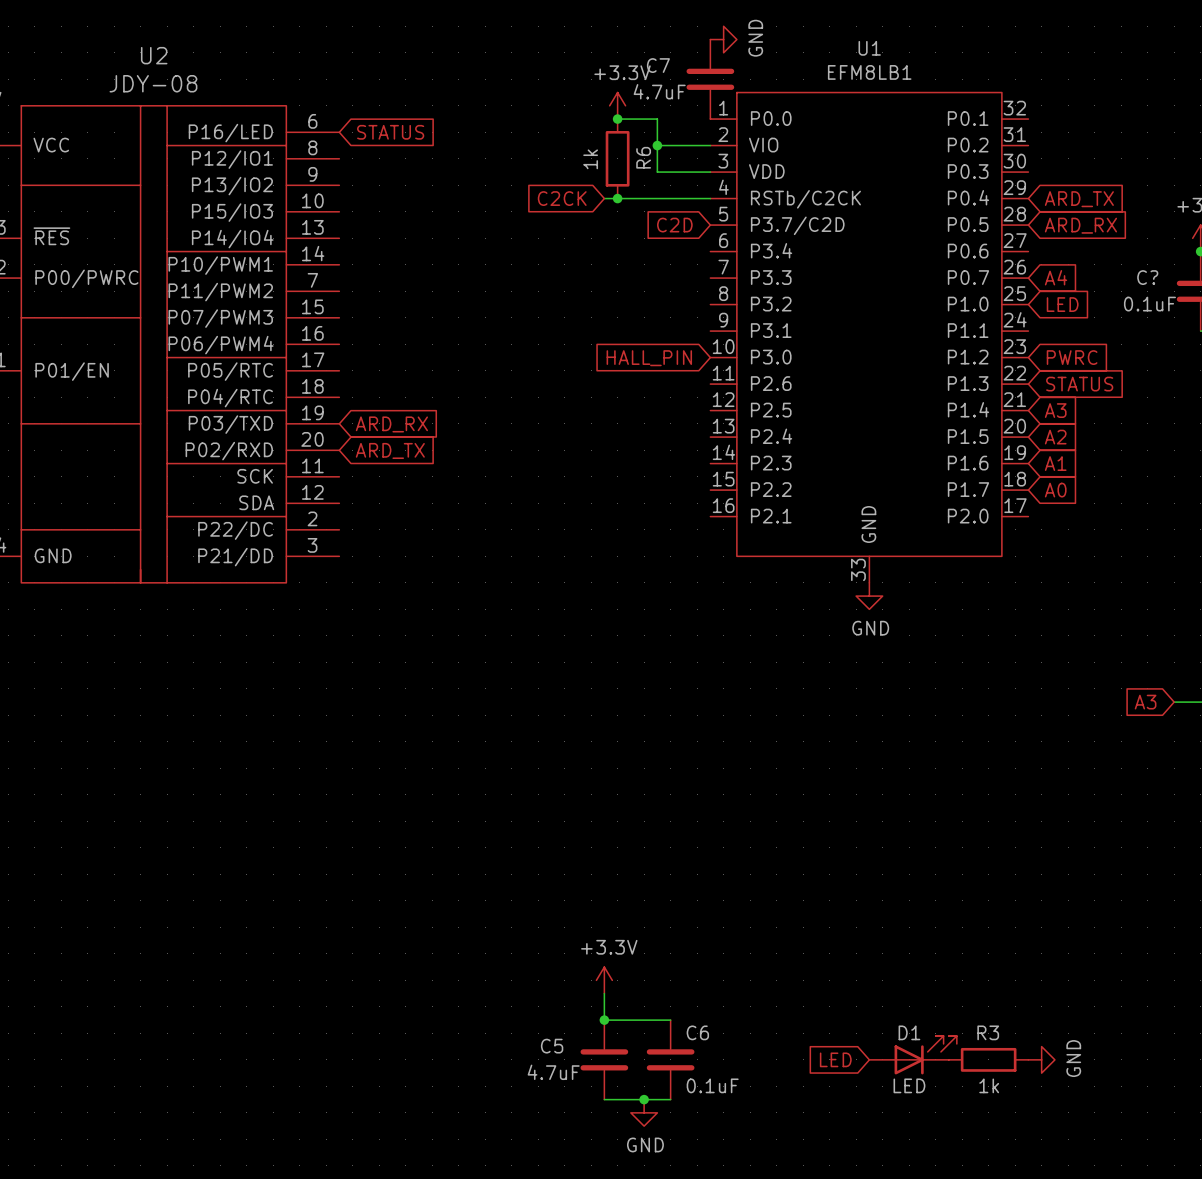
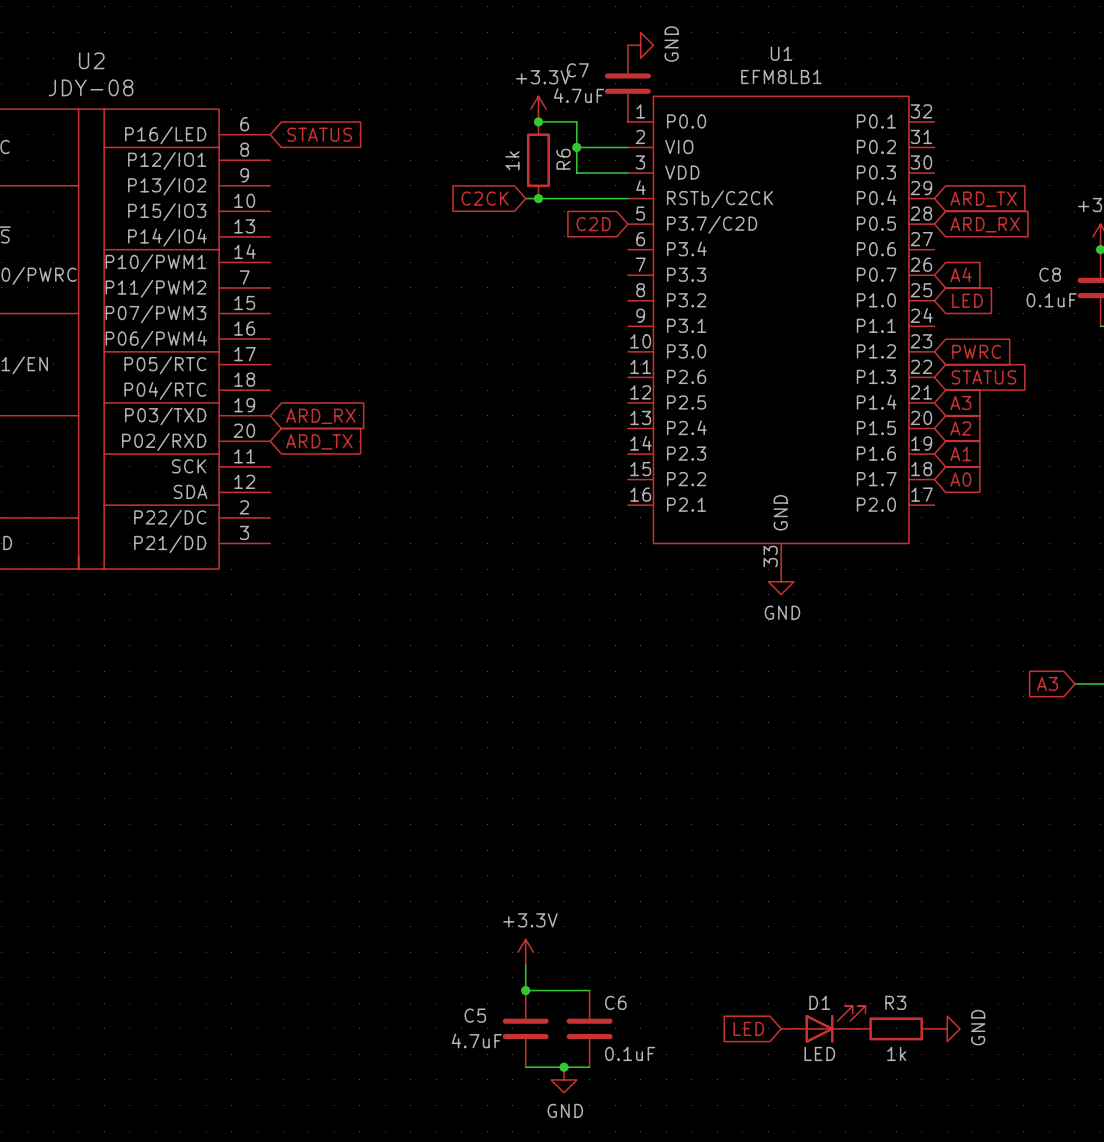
C? name: C? (1147, 277) -> C8 (1050, 274)
global label: HALL_PIN (649, 358) -> none

